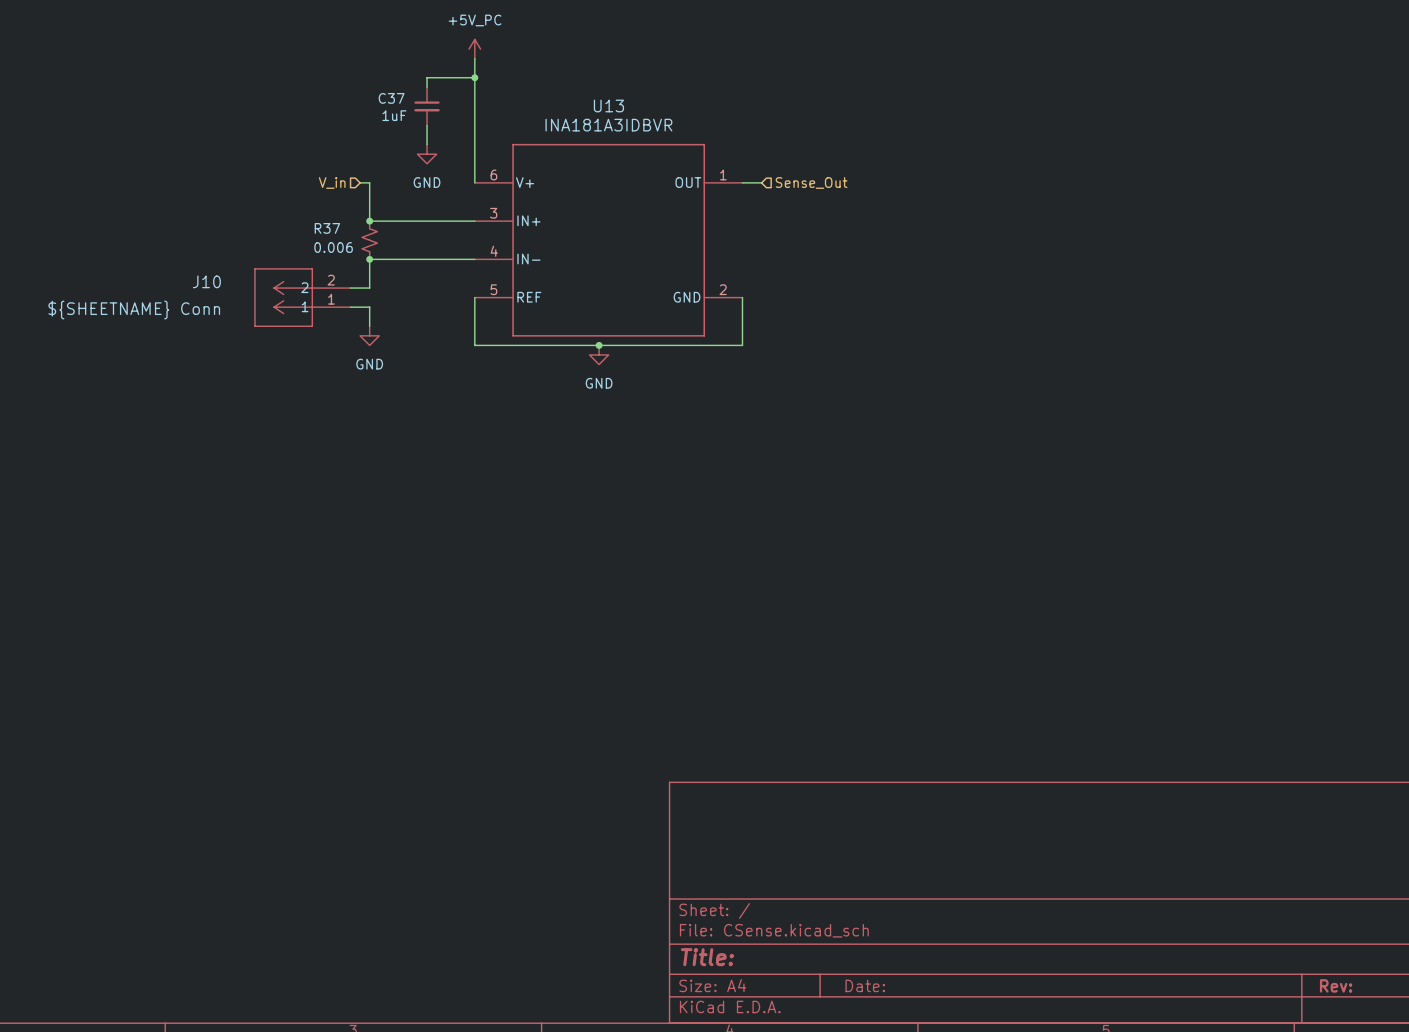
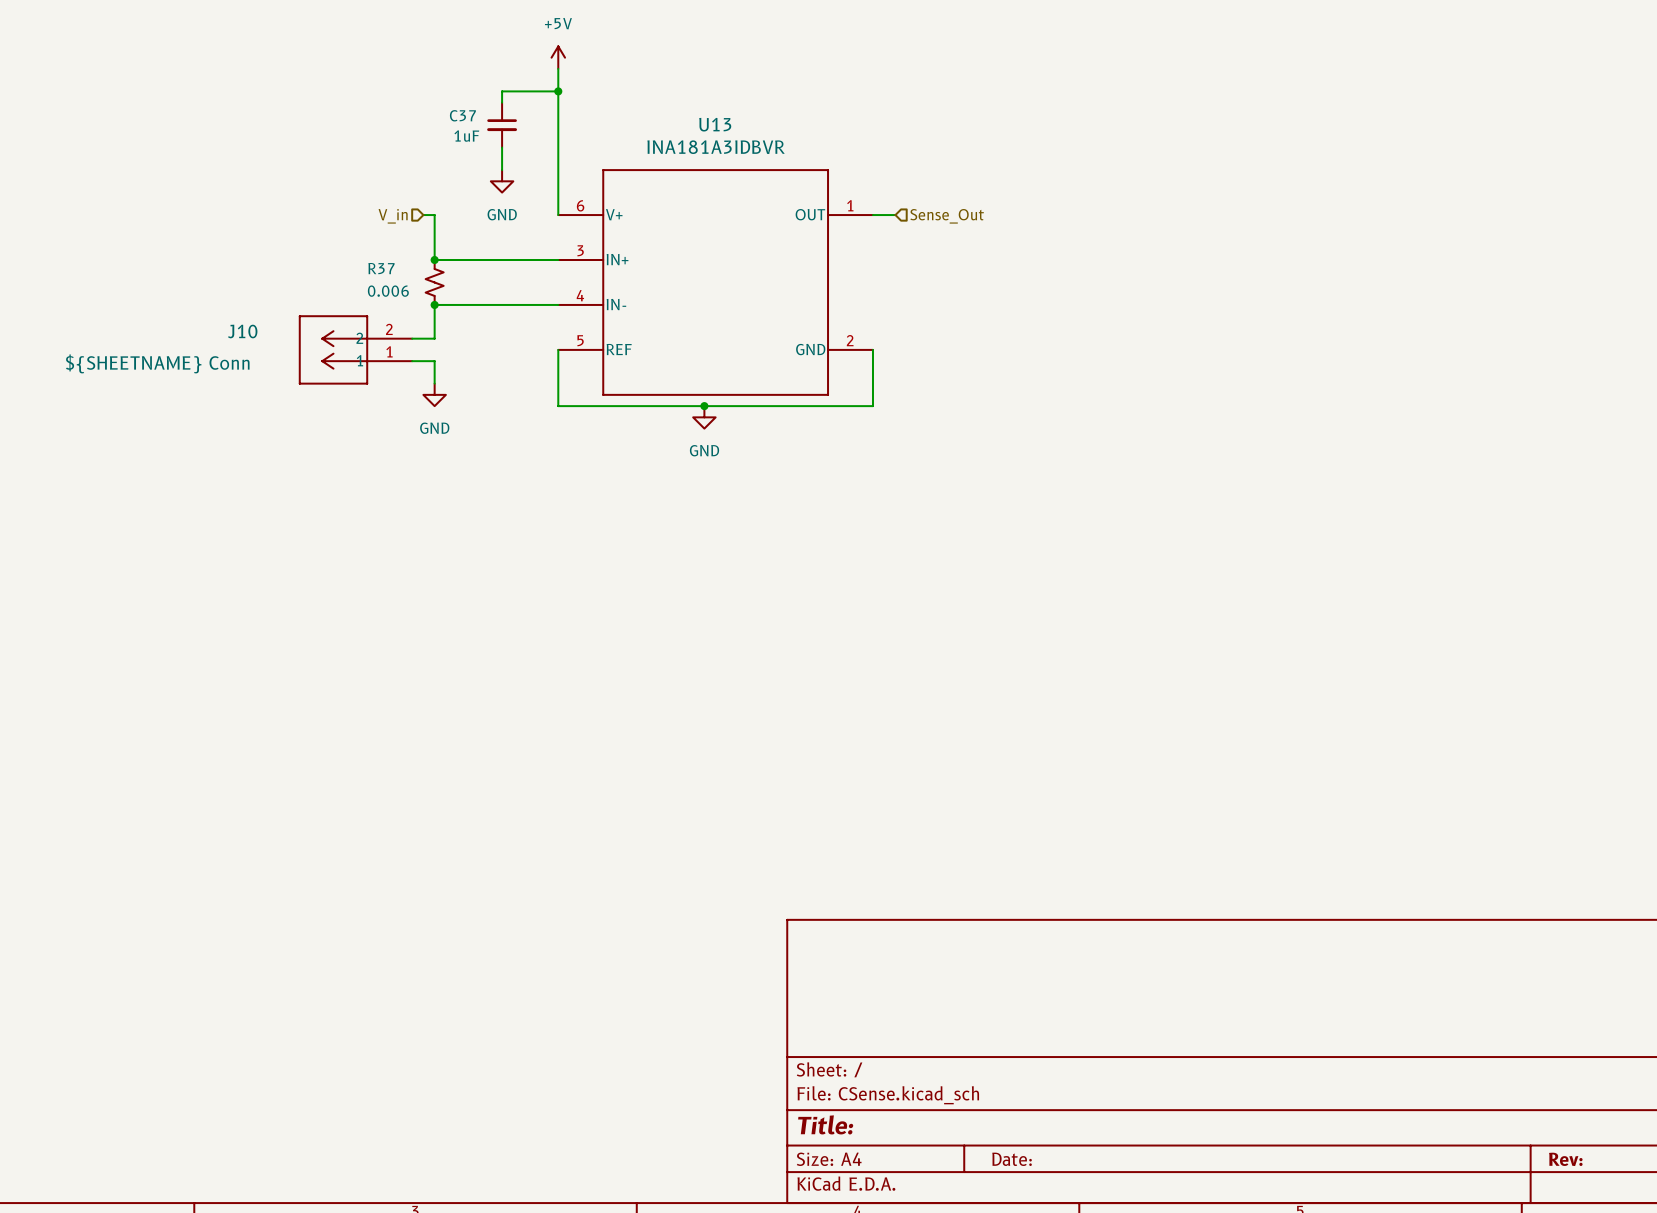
power symbol: +5V_PC (474, 49) -> +5V (558, 57)

